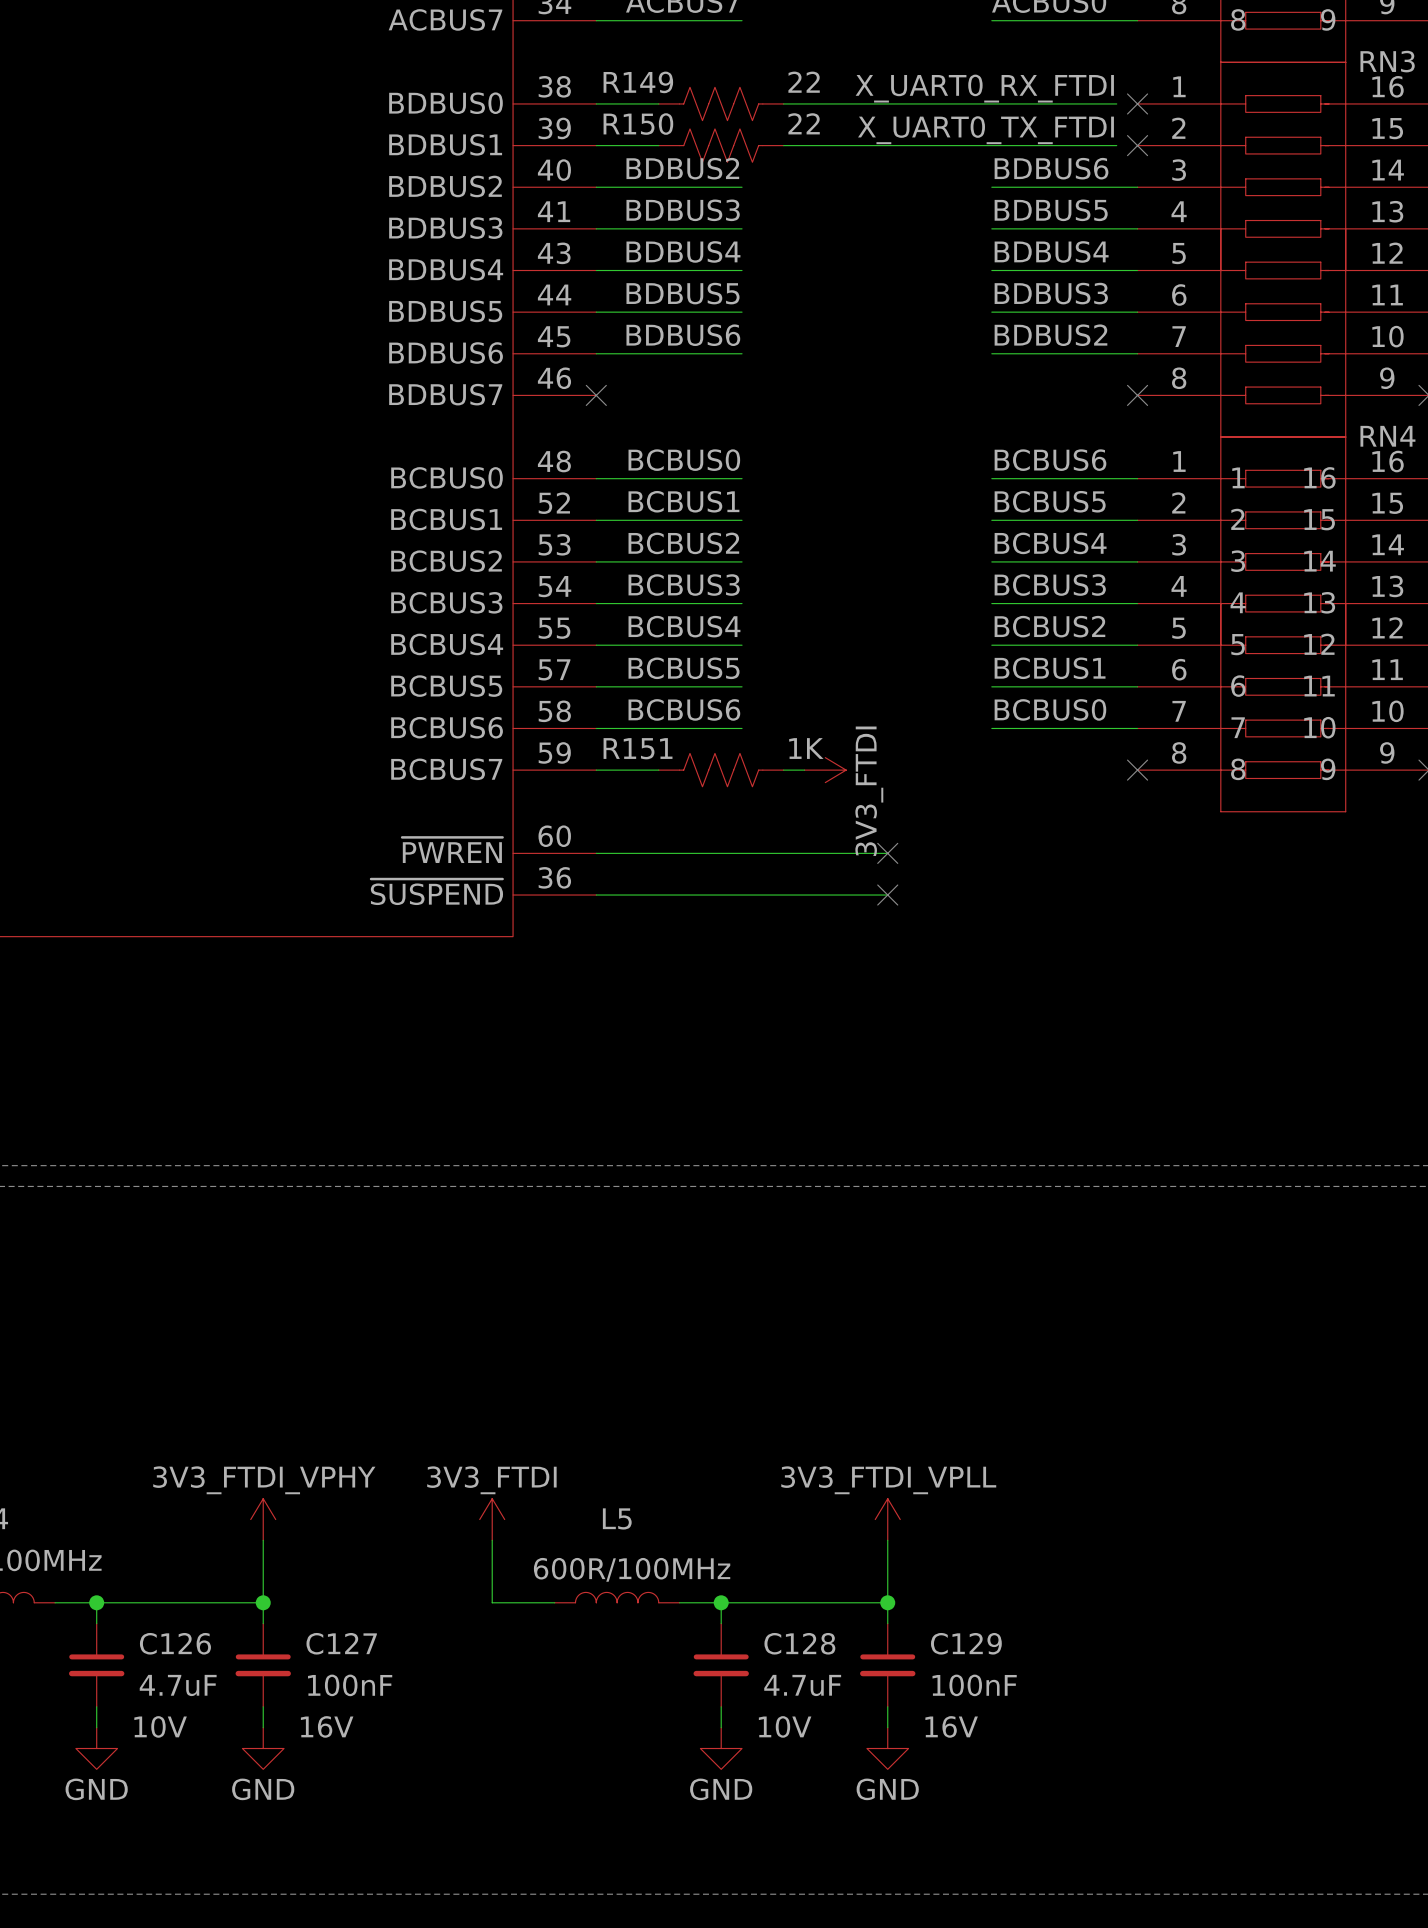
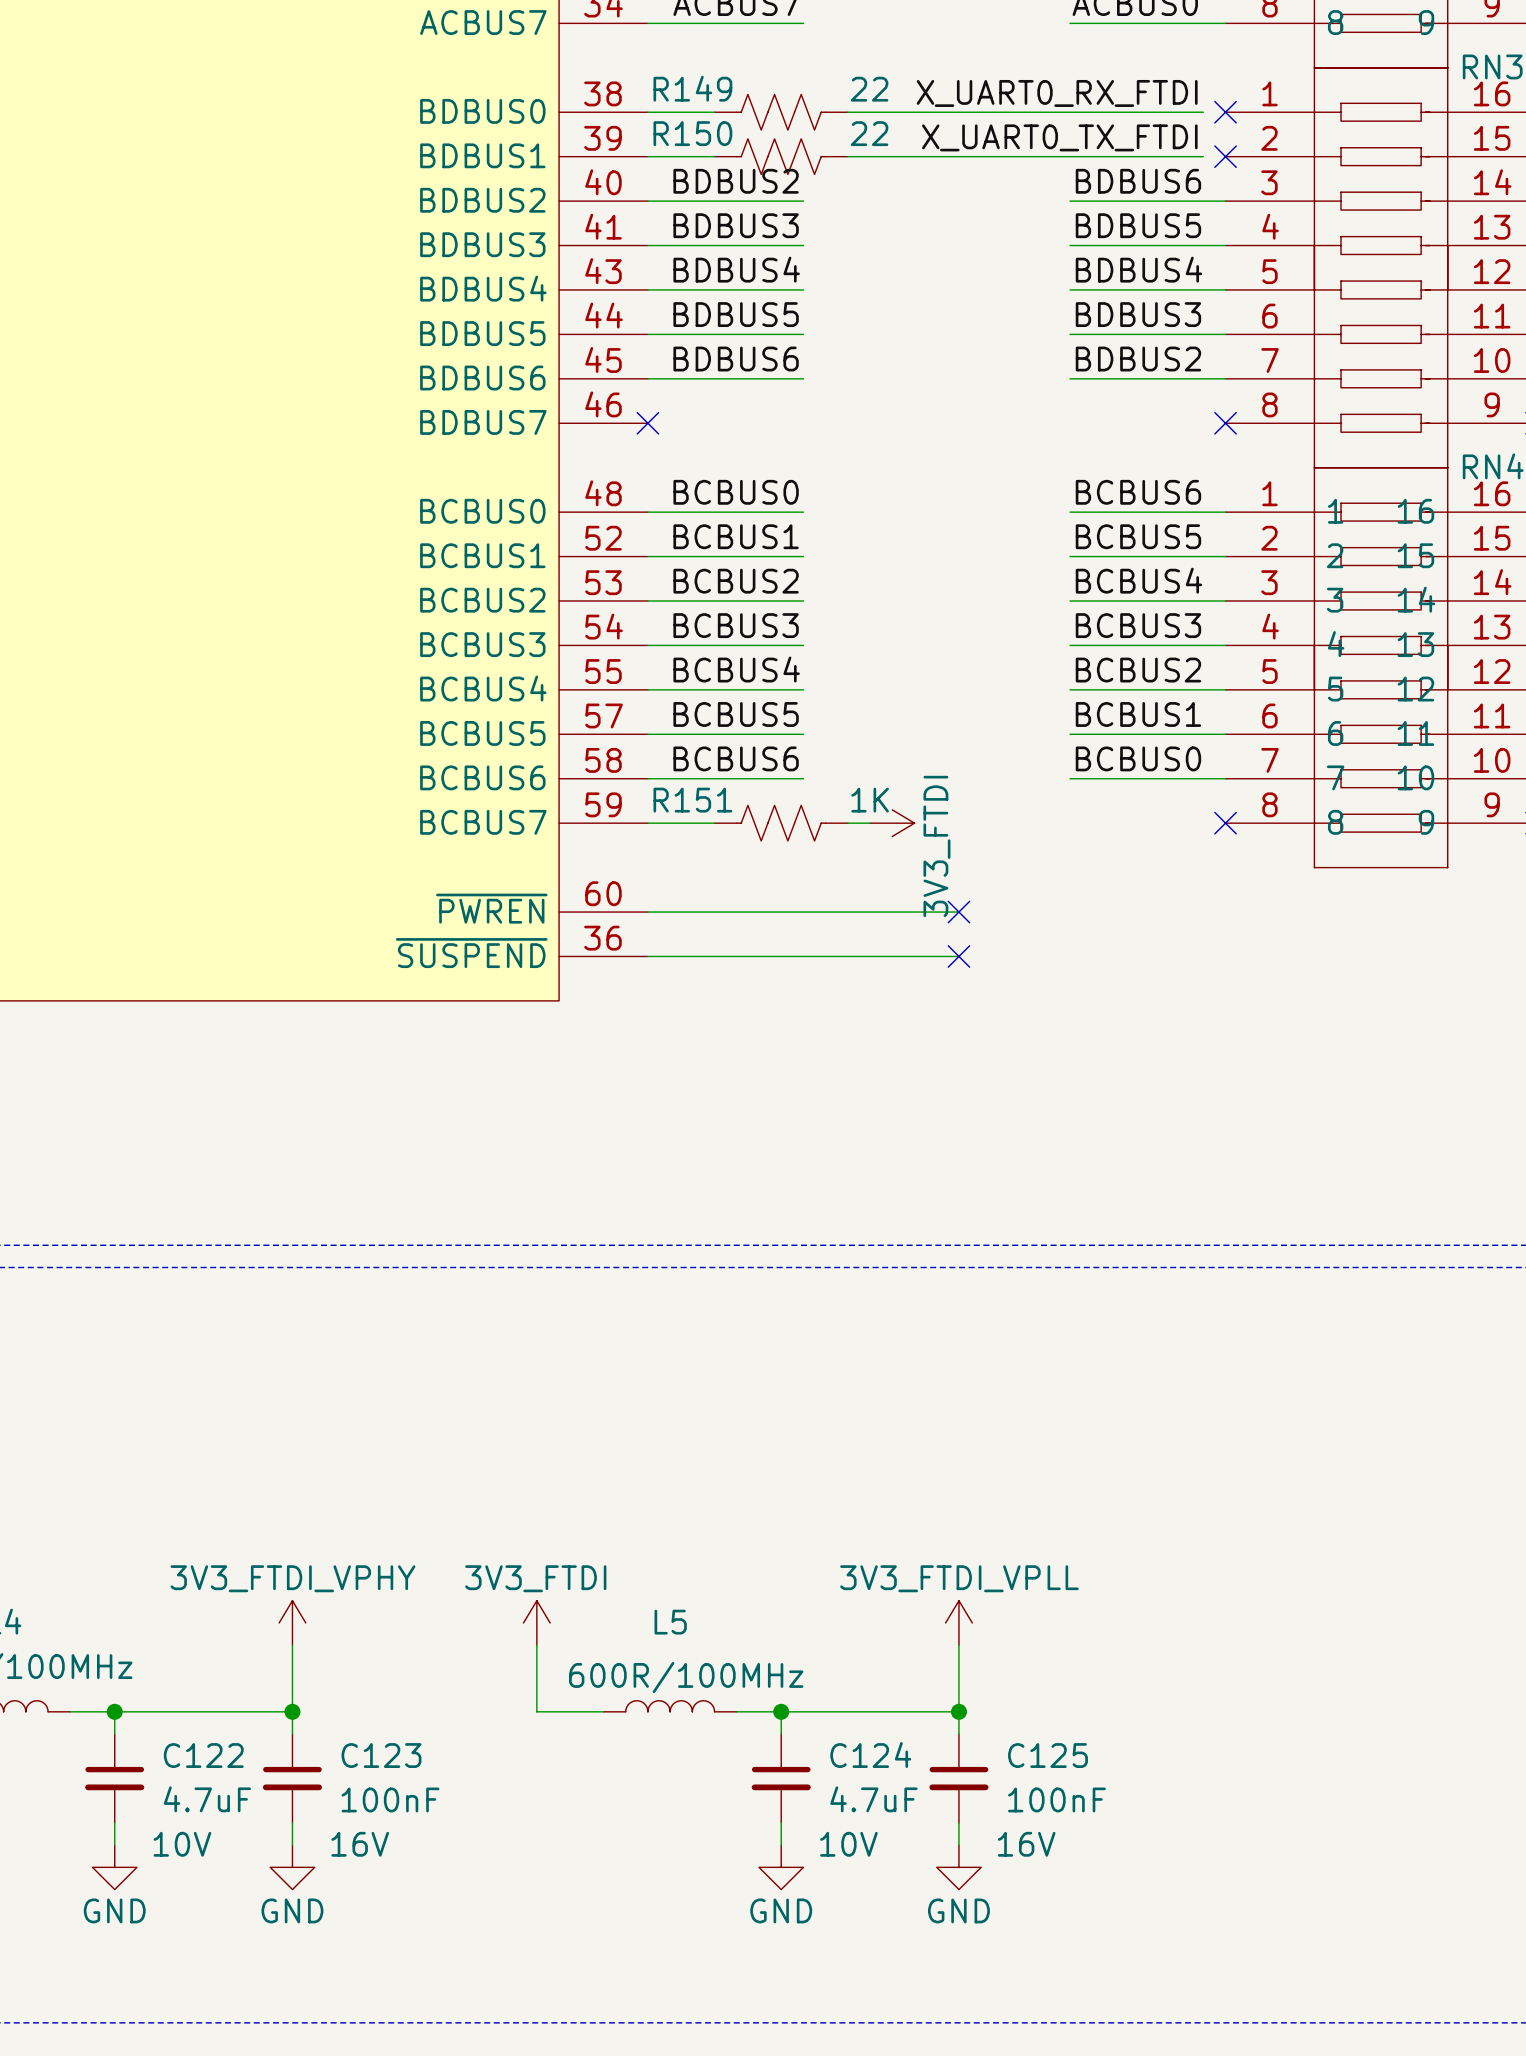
C126 name: C126 (175, 1643) -> C122 (203, 1755)
C127 name: C127 (341, 1643) -> C123 (381, 1755)
C128 name: C128 (799, 1643) -> C124 (870, 1755)
C129 name: C129 (966, 1643) -> C125 (1047, 1755)

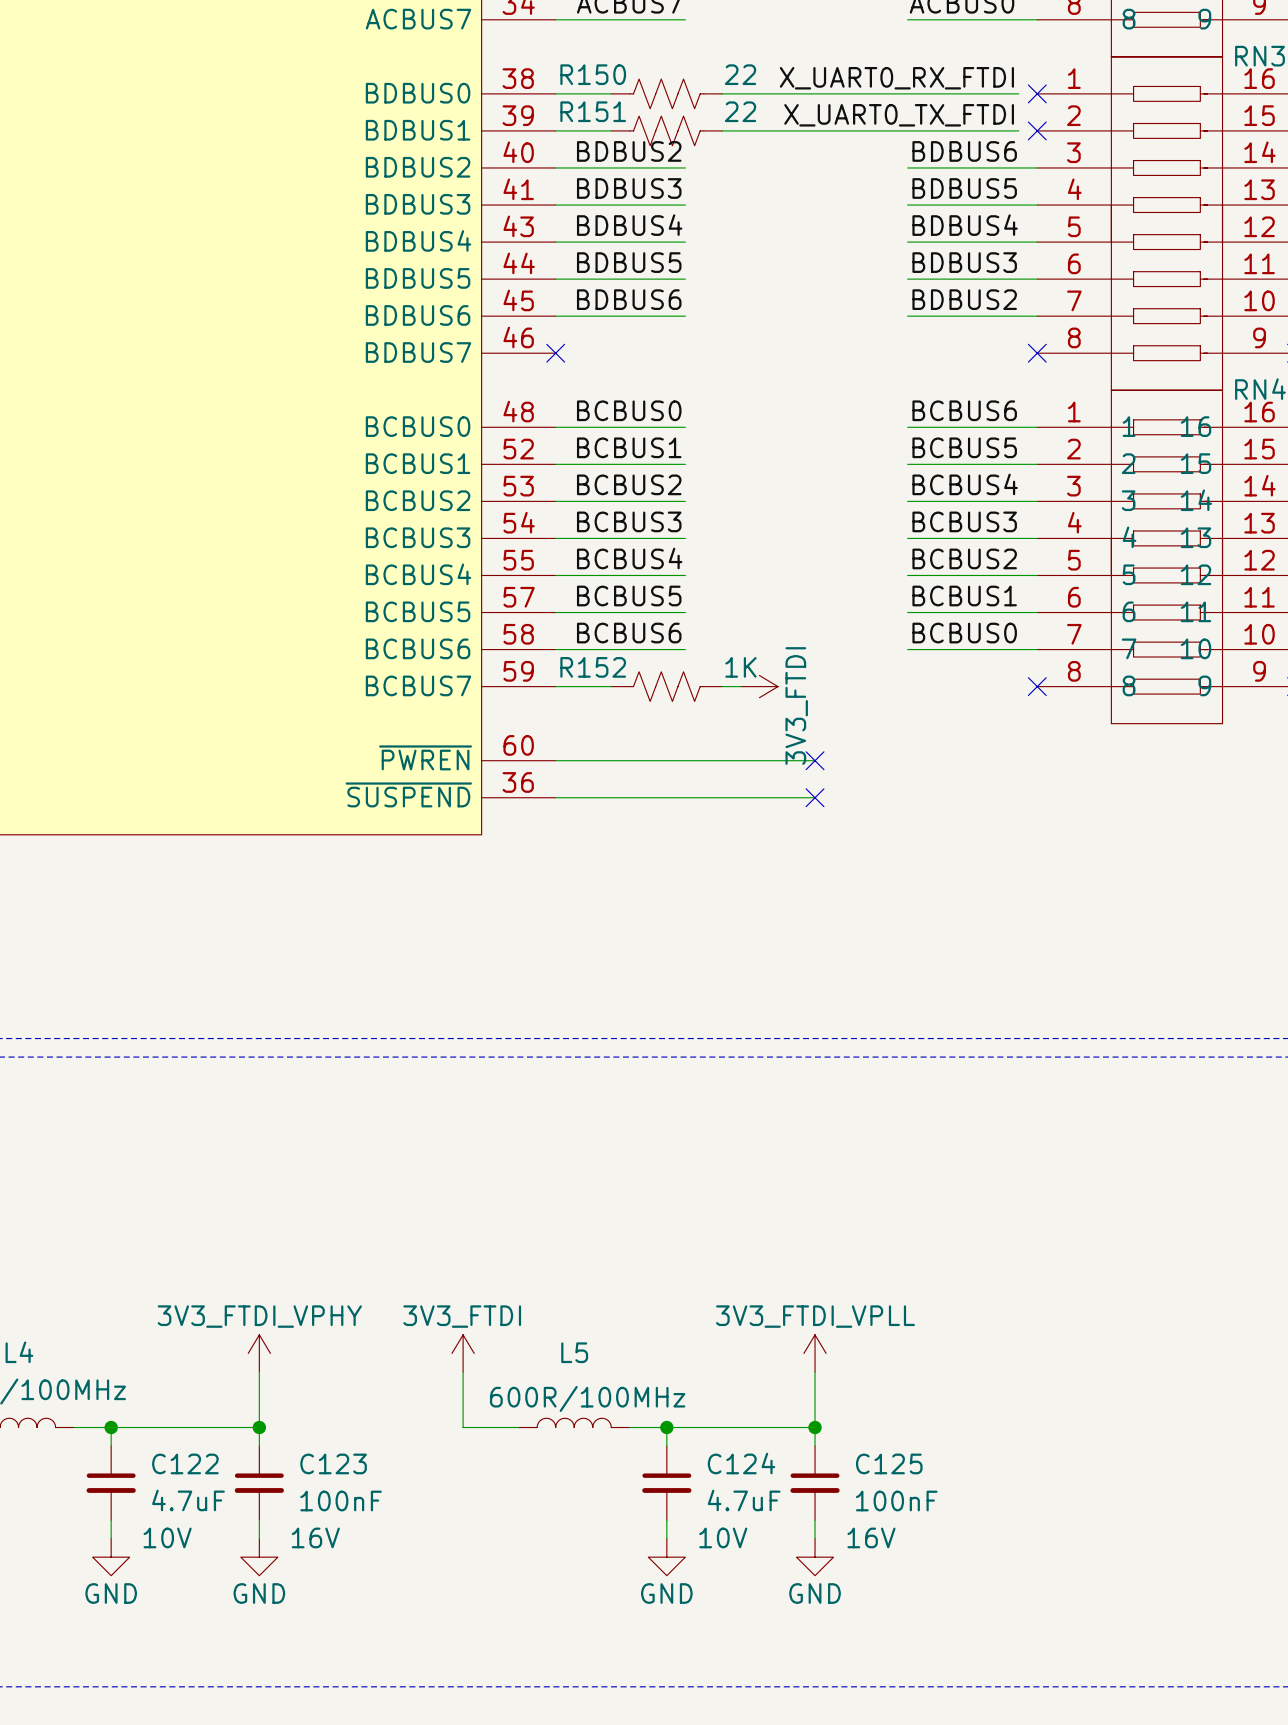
R149 name: R149 (692, 88) -> R150 (593, 74)
R150 name: R150 (692, 133) -> R151 (593, 111)
R151 name: R151 (692, 800) -> R152 (593, 667)

